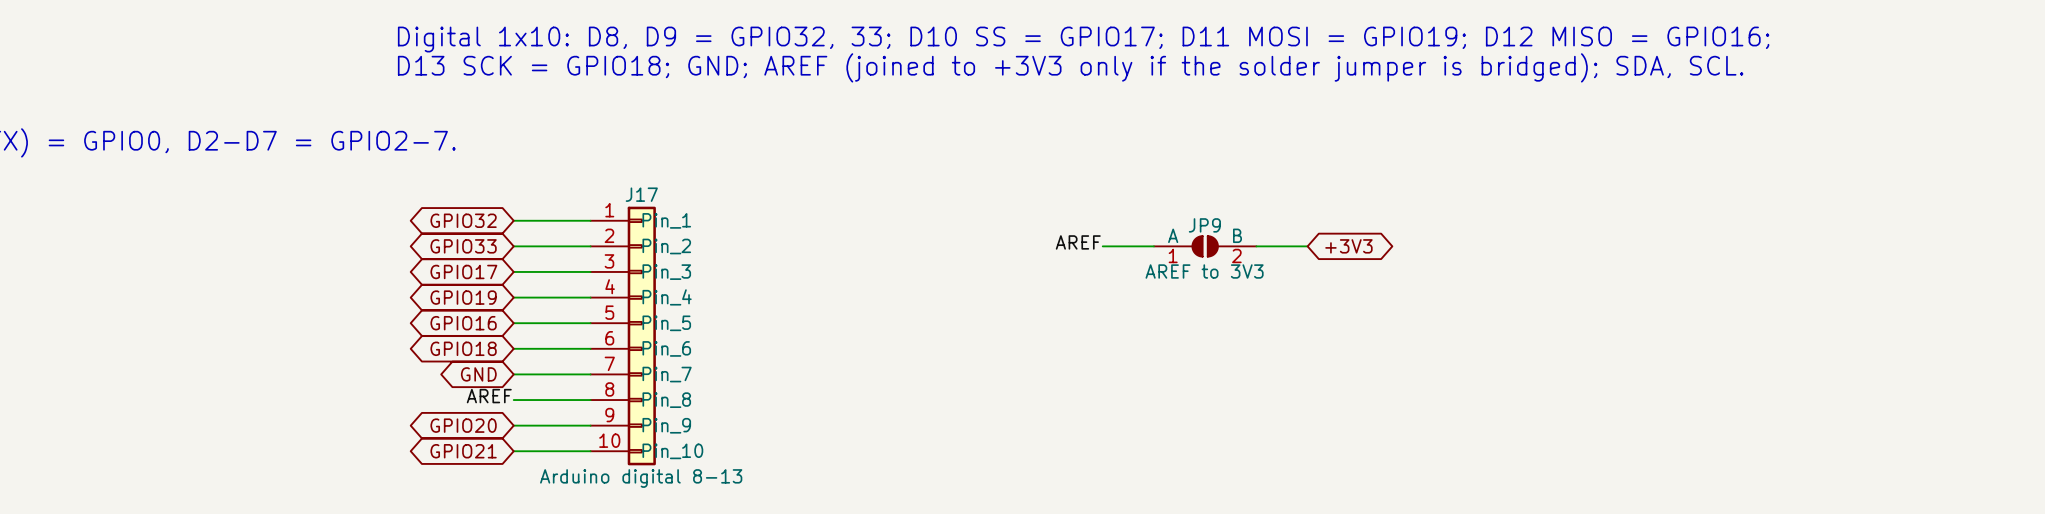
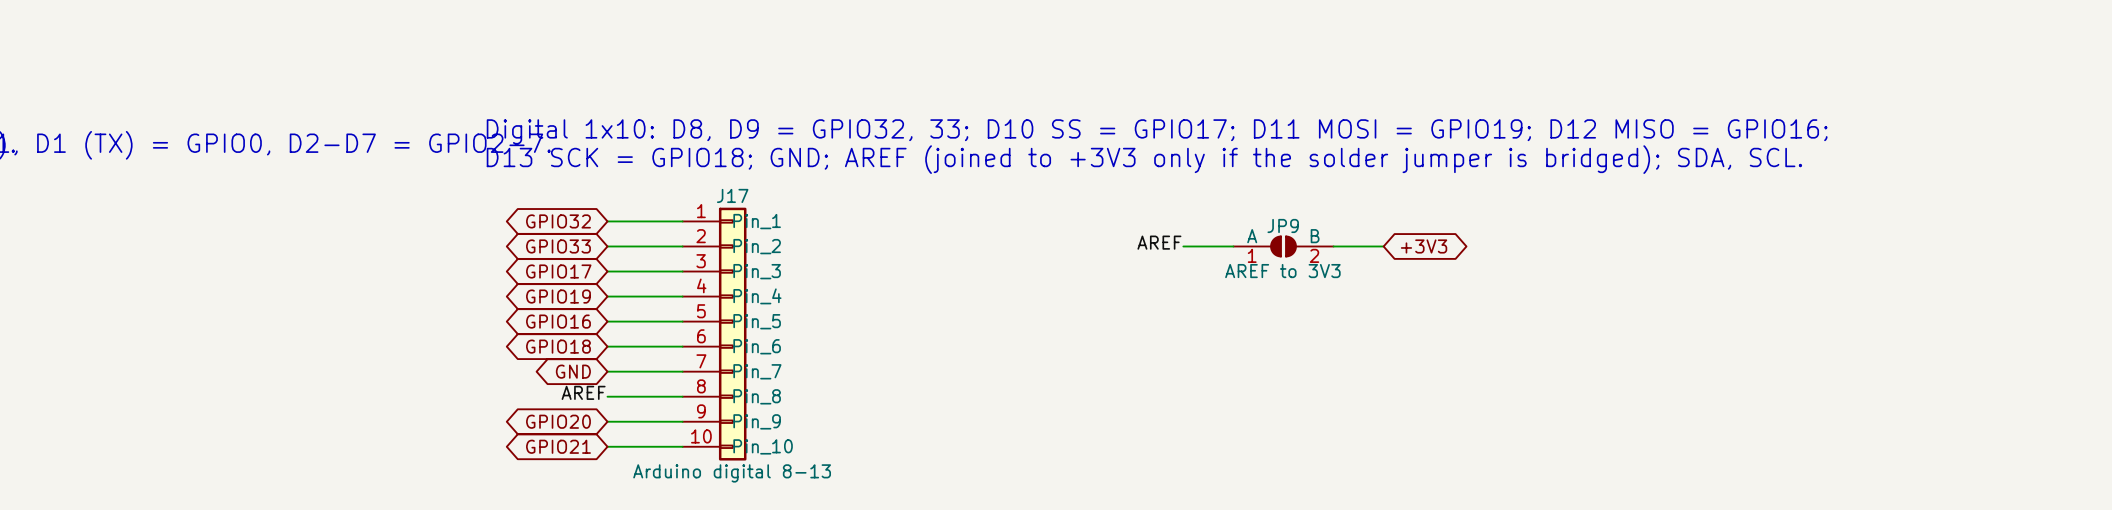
text position: Digital 1x10: D8, D9 = GPIO32, 33; D10 SS = GPIO17; D11 MOSI = GPIO19; D12 MISO = GPIO16; (1083, 39) -> Digital 1x10: D8, D9 = GPIO32, 33; D10 SS = GPIO17; D11 MOSI = GPIO19; D12 MISO = GPIO16; (1157, 131)
text position: D13 SCK = GPIO18; GND; AREF (joined to +3V3 only if the solder jumper is bridged); SDA, SCL. (1070, 67) -> D13 SCK = GPIO18; GND; AREF (joined to +3V3 only if the solder jumper is bridged); SDA, SCL. (1144, 159)

